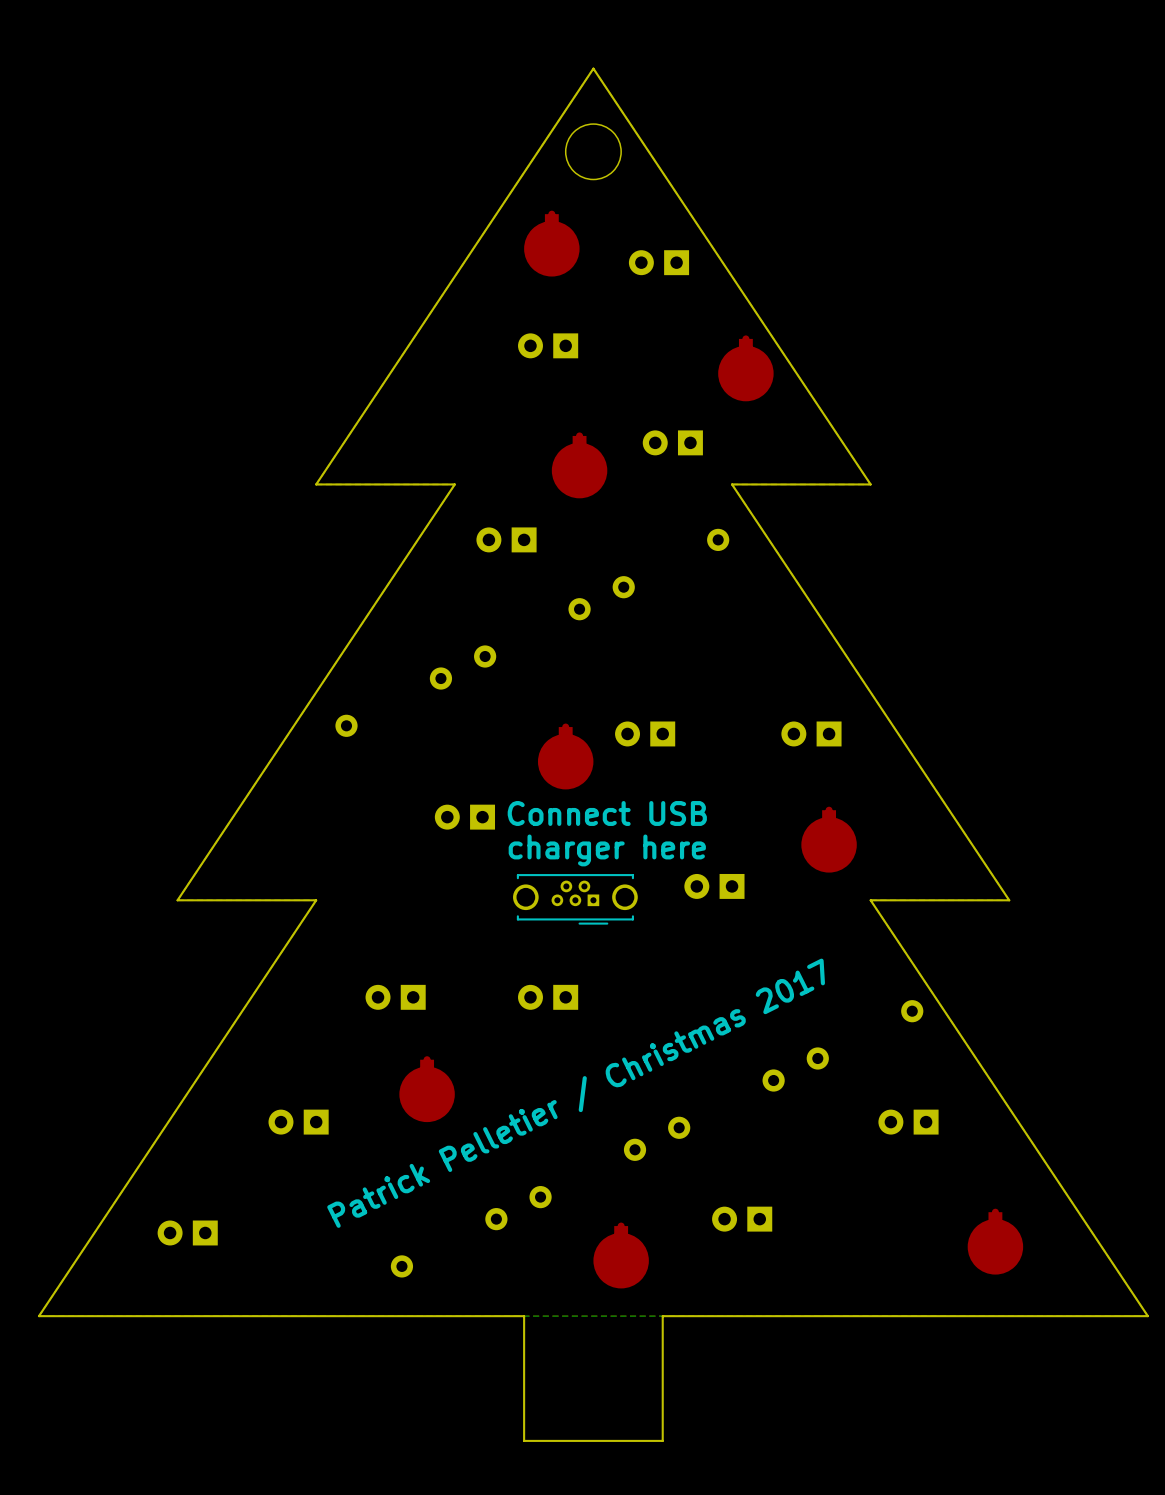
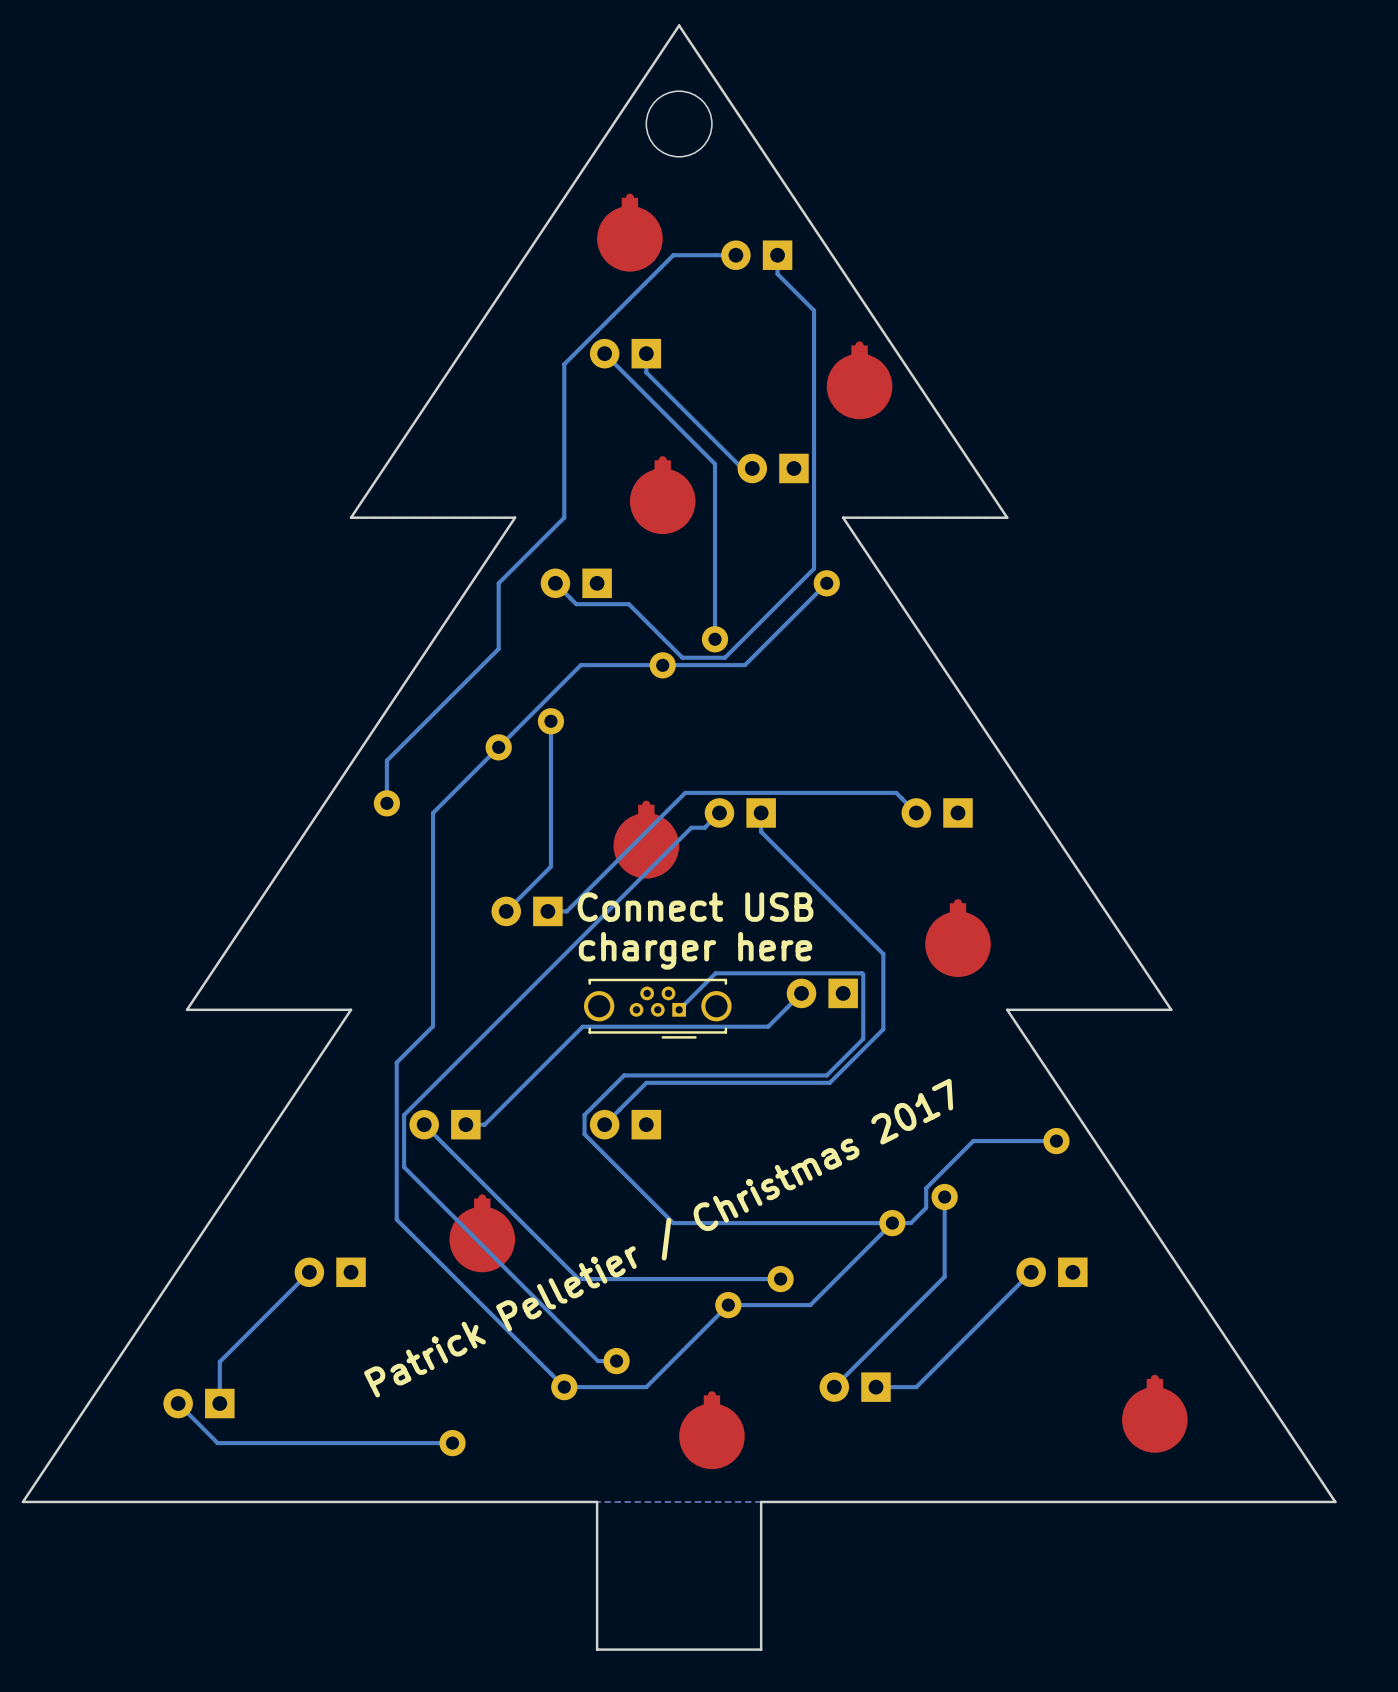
bottom track: none -> (735, 255) (673, 255) (564, 364) (564, 517) (498, 583) (498, 648) (386, 760) (386, 803)
bottom track: none -> (777, 255) (777, 274) (814, 310) (814, 568) (725, 657) (682, 657) (628, 604) (576, 604) (555, 583)
bottom track: none -> (604, 353) (715, 463) (715, 639)
bottom track: none -> (646, 353) (646, 372) (742, 468) (752, 468)
bottom track: none -> (826, 583) (744, 665) (580, 665) (433, 812) (433, 1026) (396, 1062) (396, 1219) (564, 1387) (646, 1387) (728, 1305) (810, 1305) (892, 1223)
bottom track: none -> (550, 721) (550, 866) (506, 911)
bottom track: none -> (719, 812) (704, 827) (691, 827) (404, 1115) (404, 1167) (598, 1361) (616, 1361)
bottom track: none -> (761, 812) (761, 831) (883, 954) (883, 1029) (829, 1082) (646, 1082) (604, 1124)
bottom track: none -> (916, 812) (896, 792) (685, 792) (566, 911) (547, 911)
bottom track: none -> (801, 993) (768, 1026) (582, 1026) (484, 1124) (465, 1124)
bottom track: none -> (679, 1009) (715, 973) (863, 974) (863, 1038) (826, 1075) (624, 1075) (584, 1115) (584, 1134) (673, 1223) (910, 1223) (926, 1207) (926, 1188) (973, 1141) (1056, 1141)
bottom track: none -> (424, 1124) (578, 1279) (780, 1279)
bottom track: none -> (944, 1197) (944, 1276) (834, 1387)
bottom track: none -> (309, 1272) (219, 1361) (219, 1403)
bottom track: none -> (1031, 1272) (916, 1387) (875, 1387)
bottom track: none -> (178, 1403) (217, 1443) (452, 1443)

